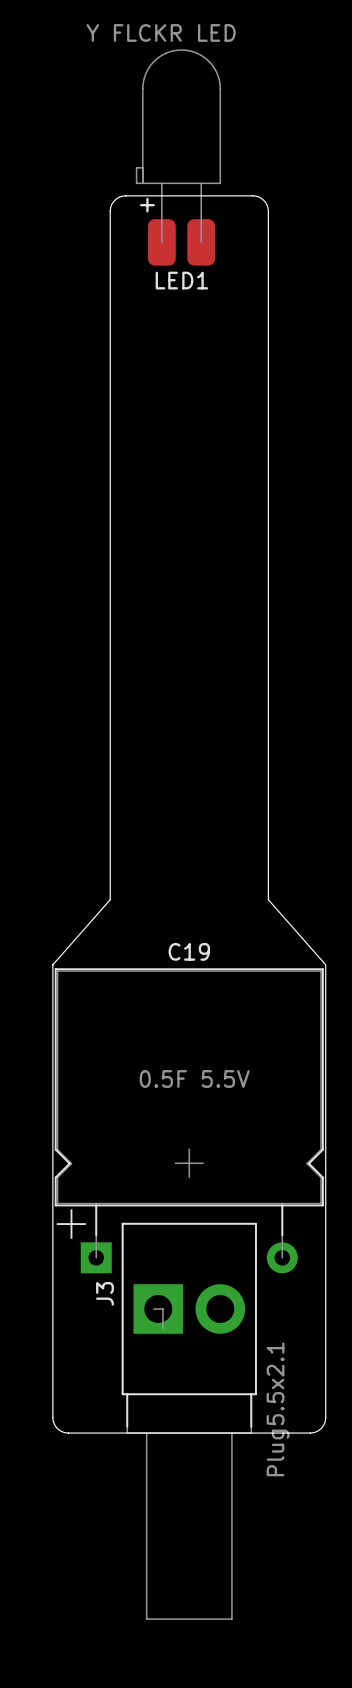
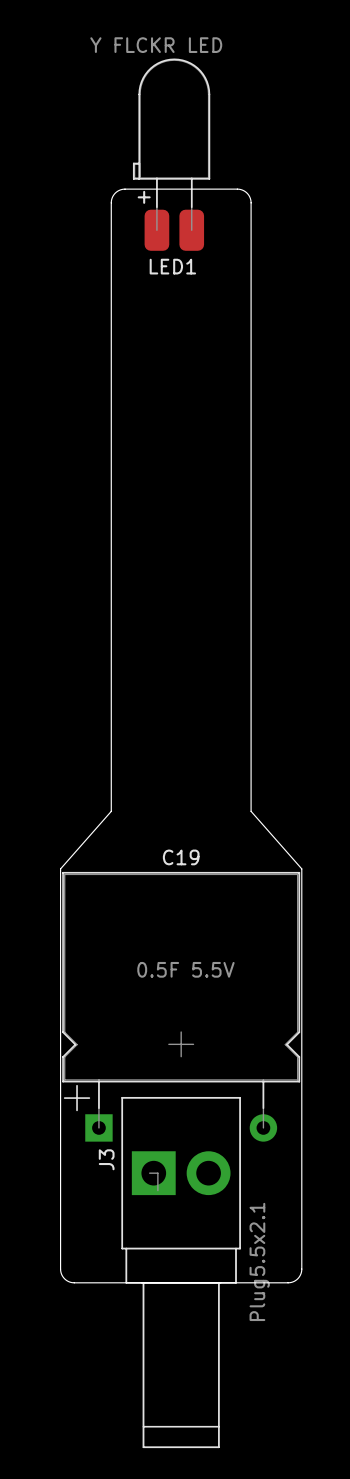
LED1 footprint: [135, 49, 222, 266] -> [132, 58, 211, 251]
J3 footprint: [121, 1222, 257, 1620] -> [121, 1096, 241, 1449]

